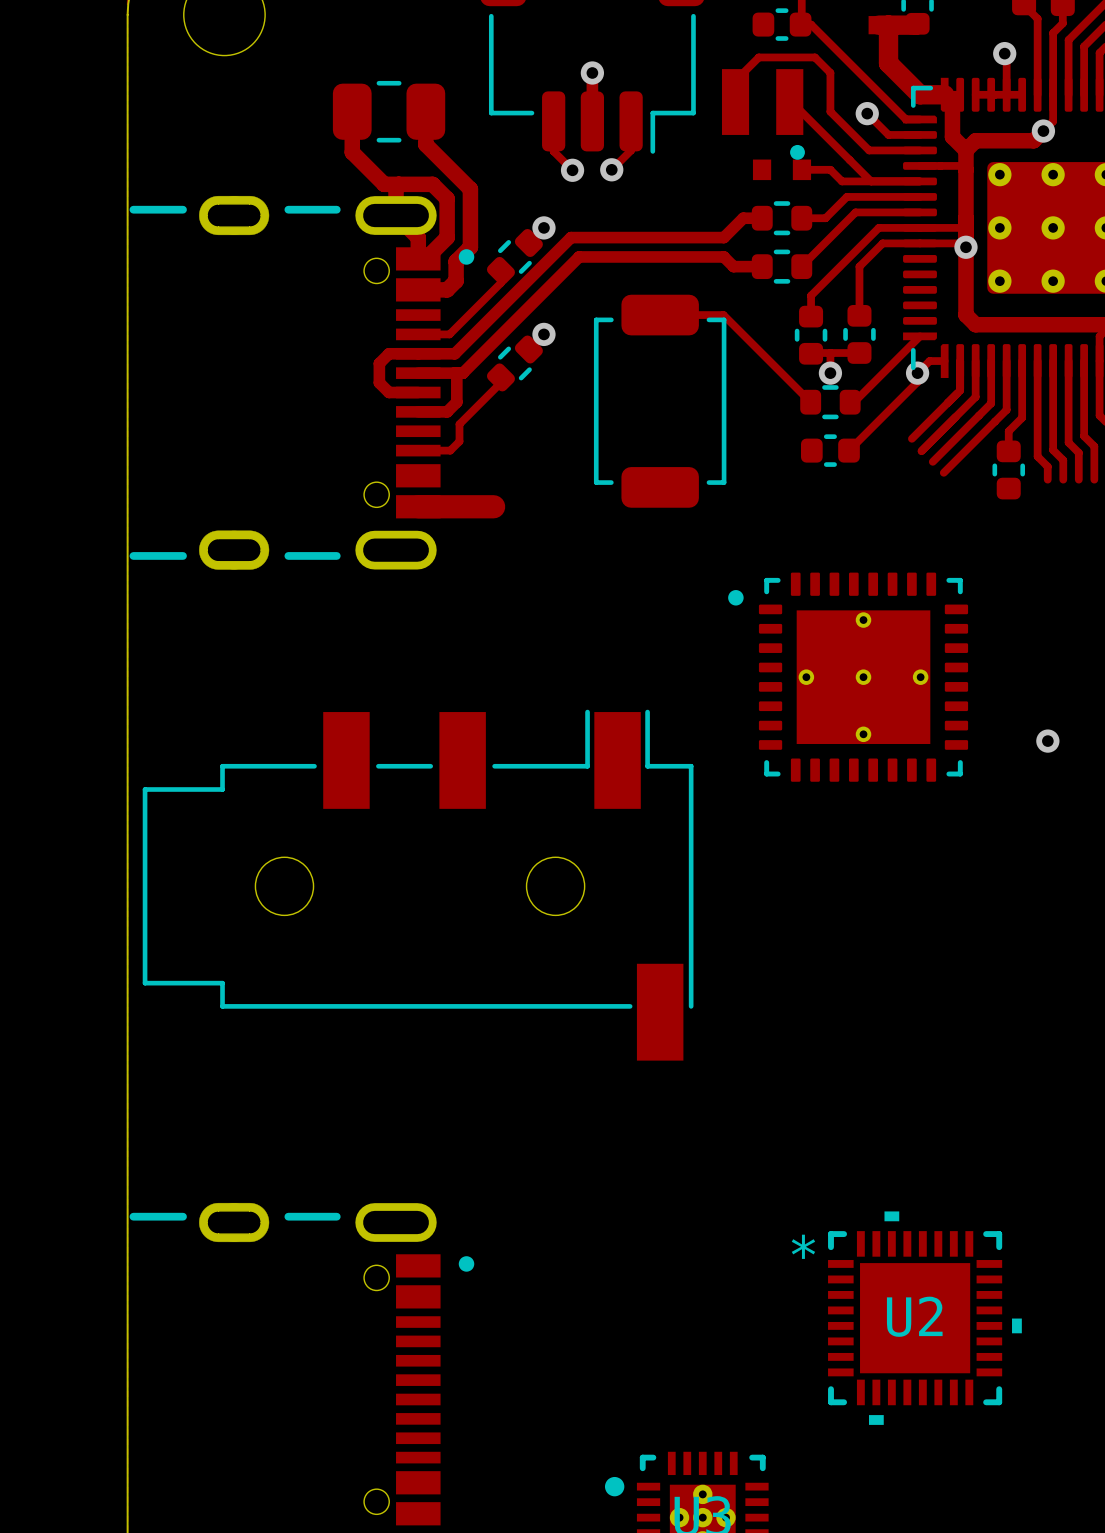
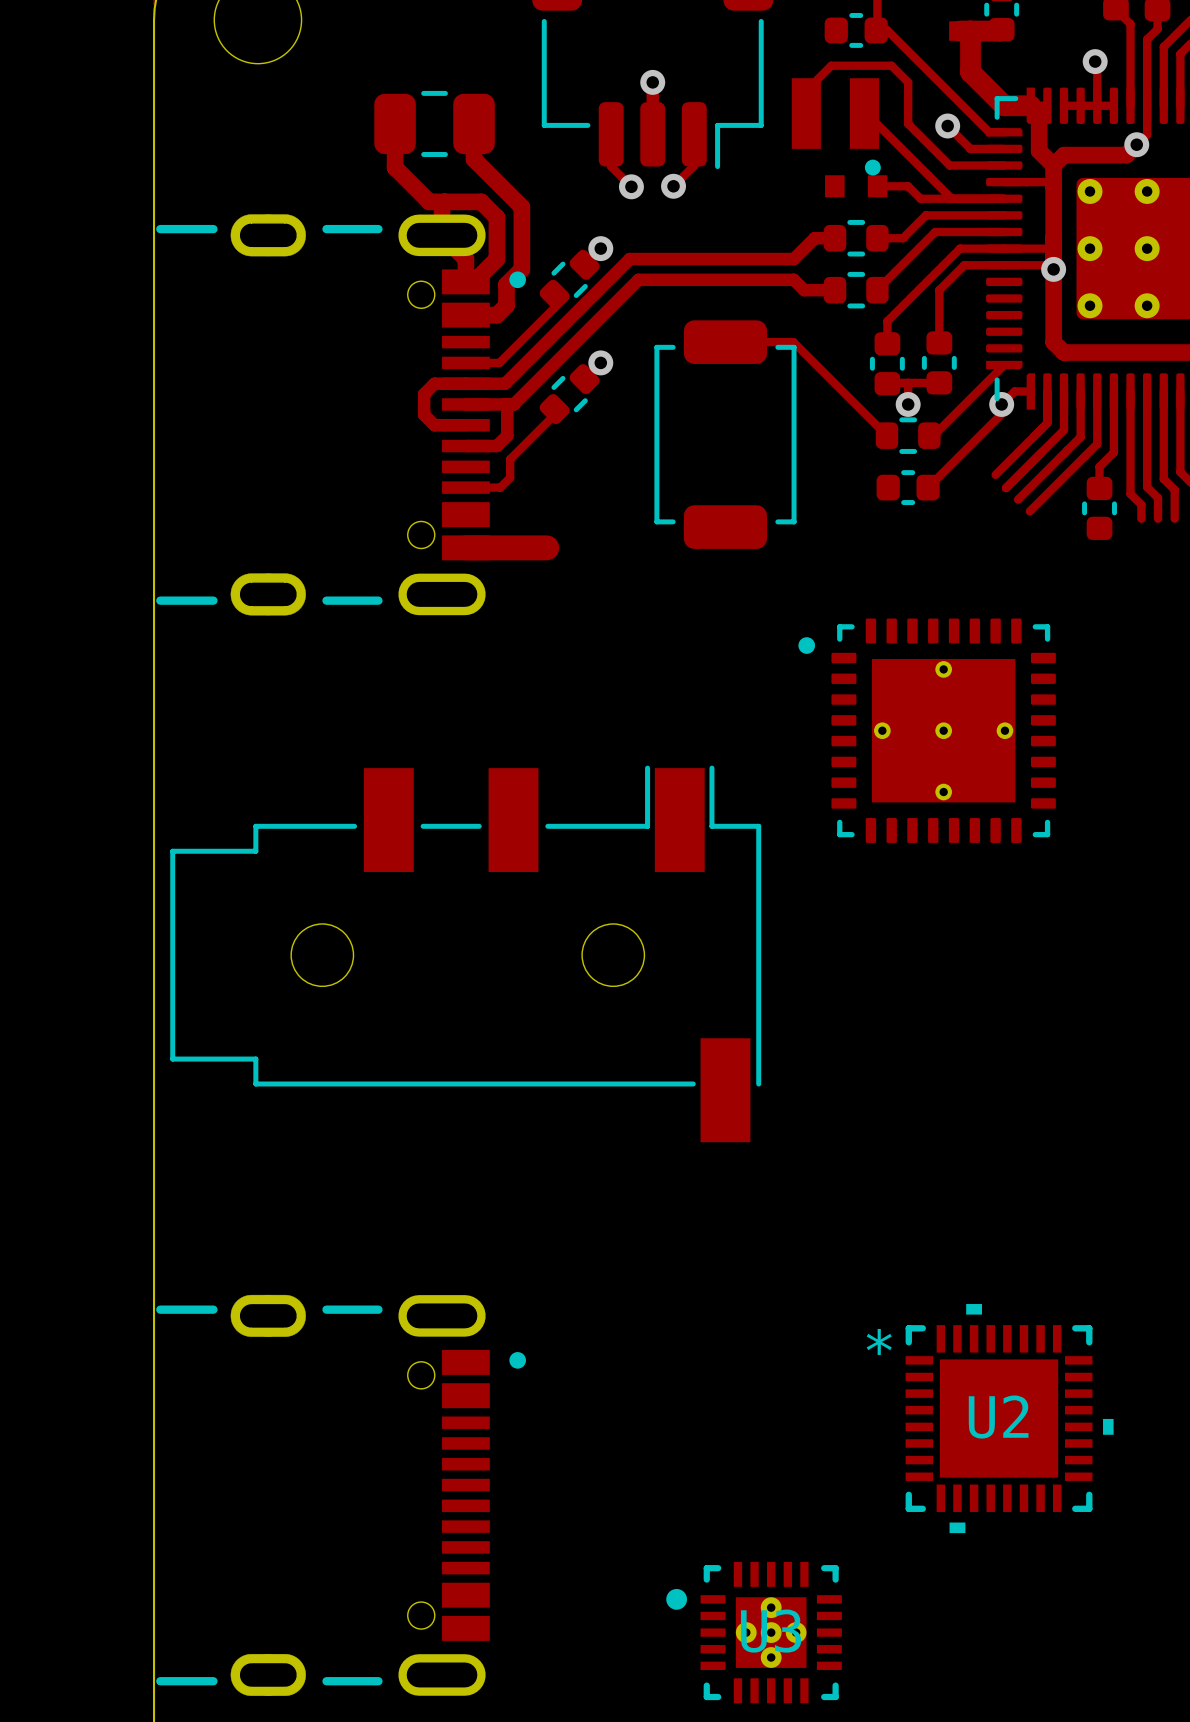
via: (1047, 741) -> none

